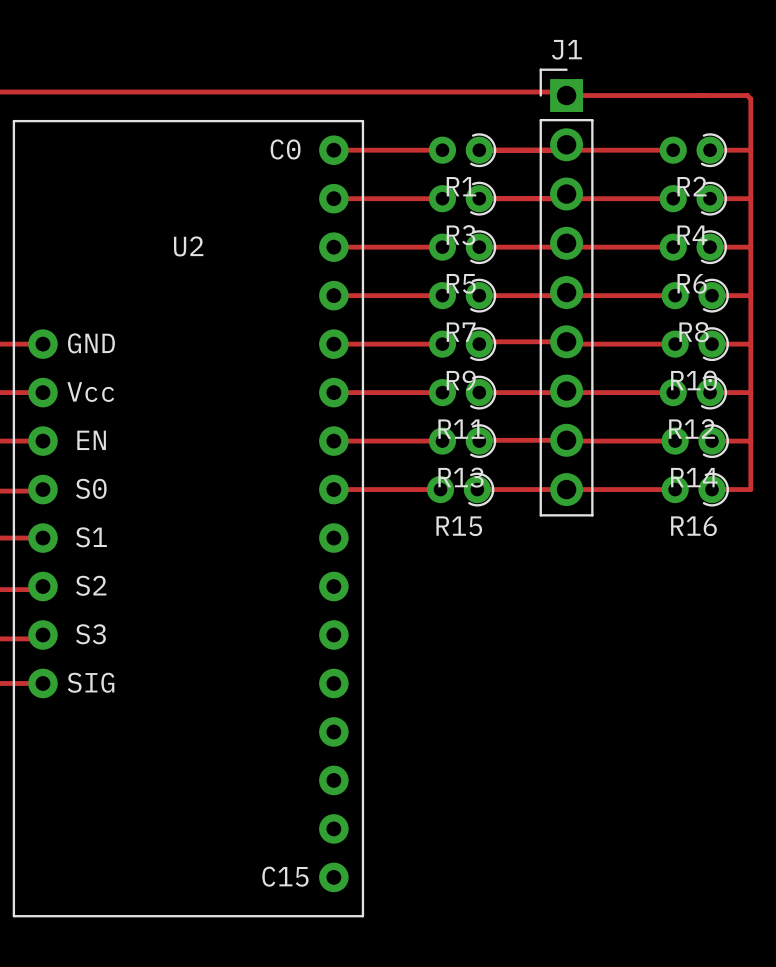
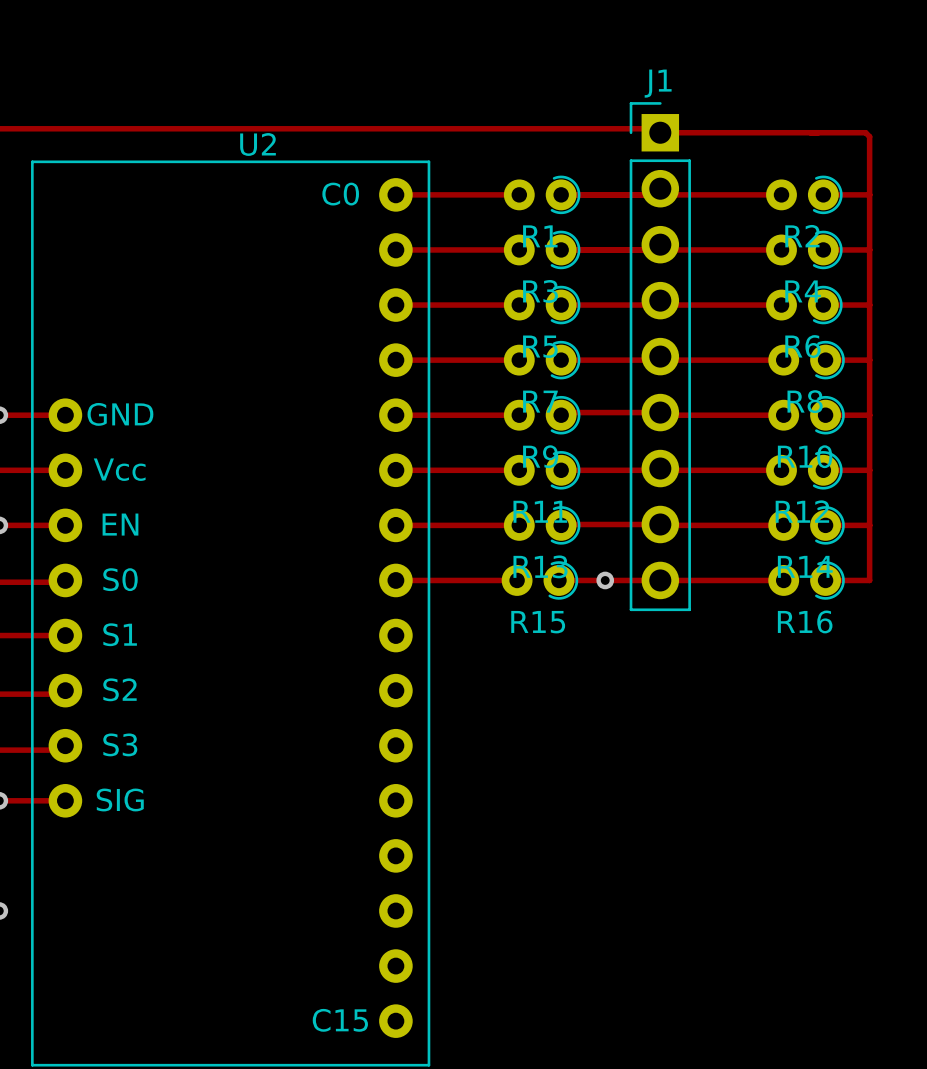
U2 name position: U2 (188, 246) -> U2 (258, 144)
via: none -> (605, 580)

